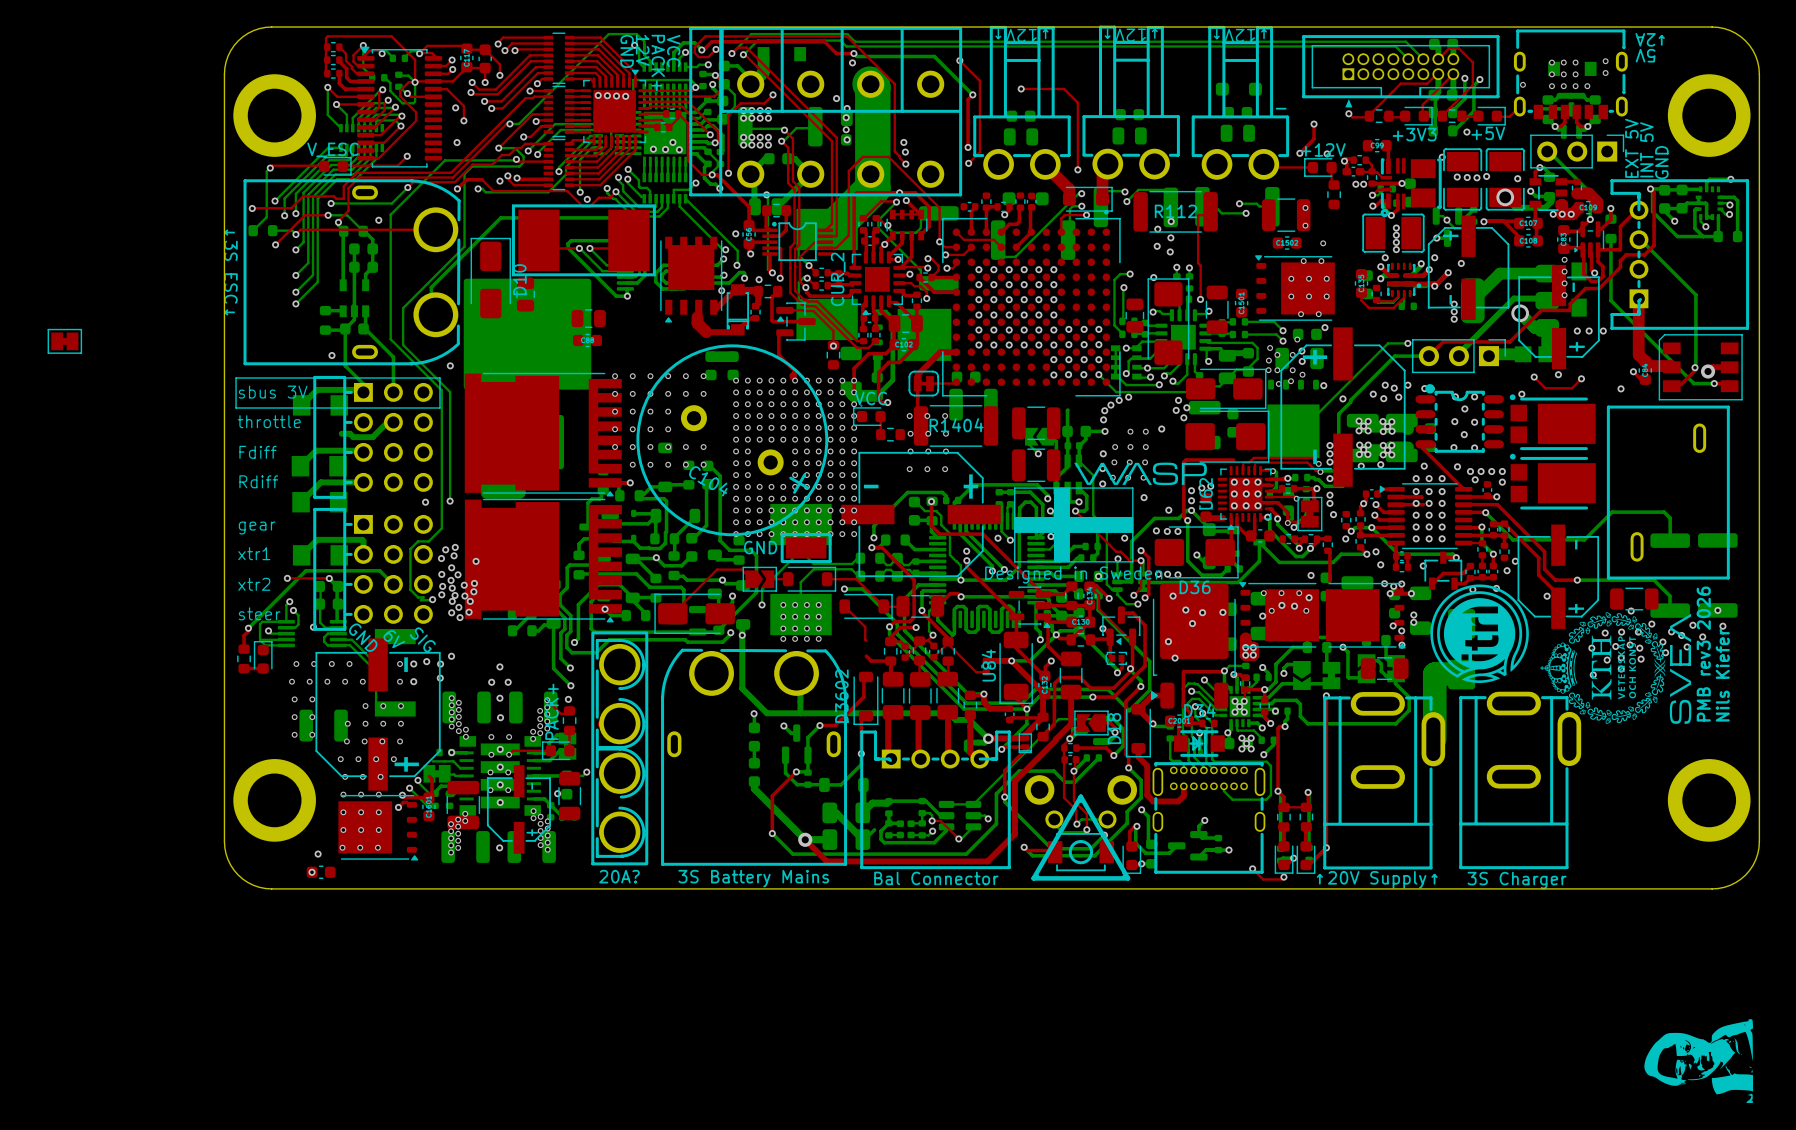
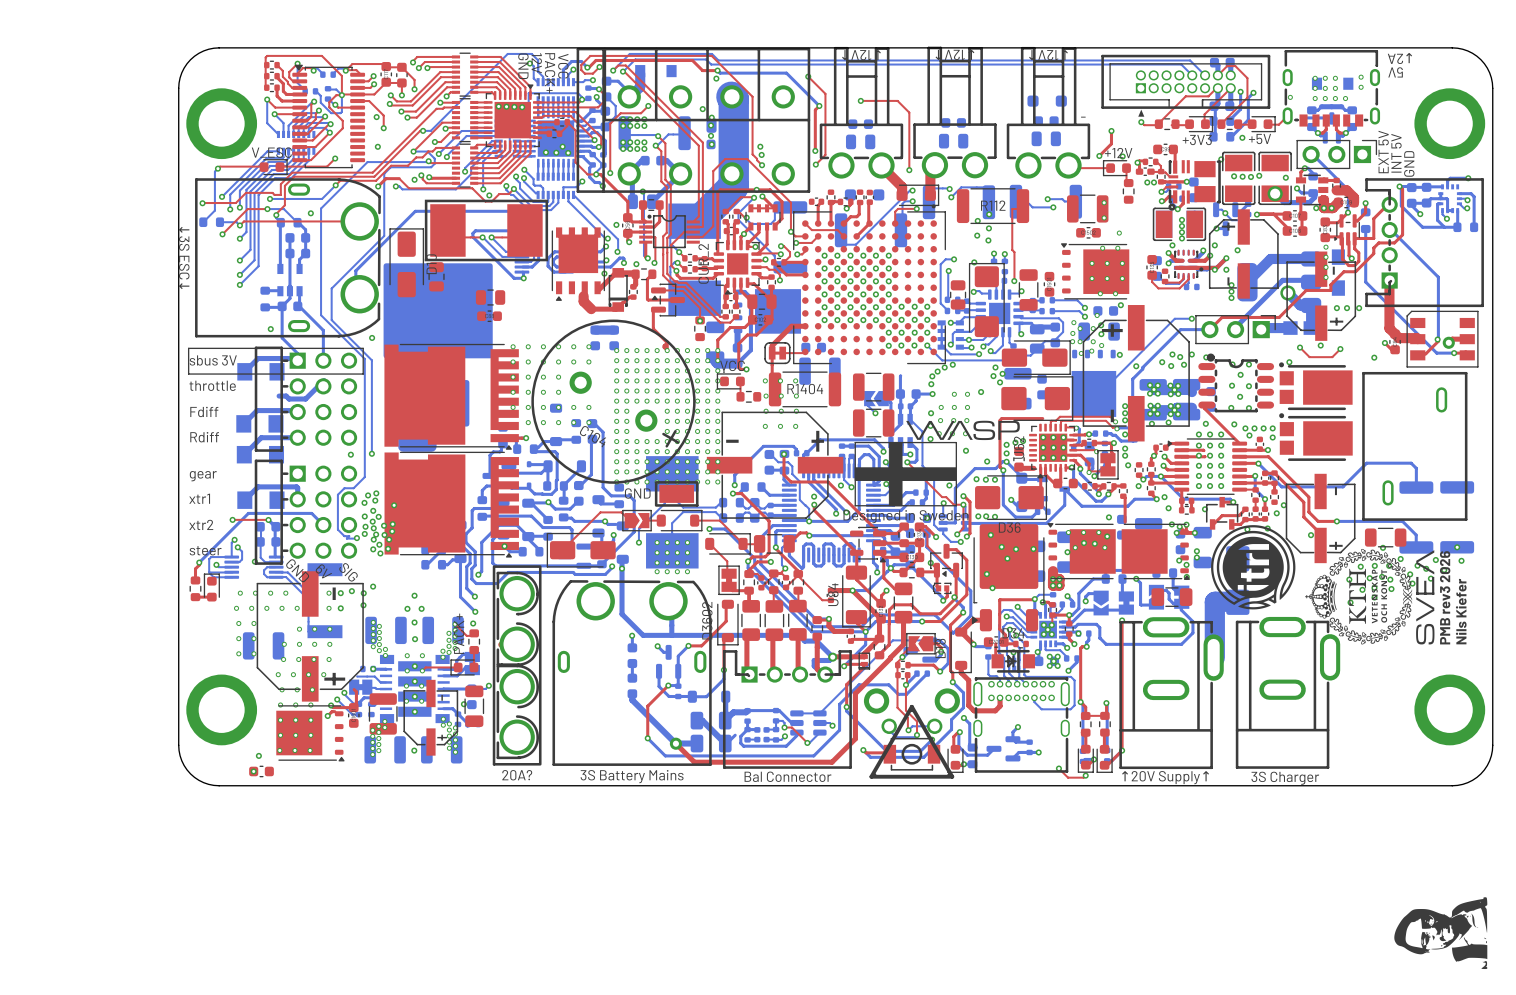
part: (64, 341) -> none
part: none -> (729, 580)

